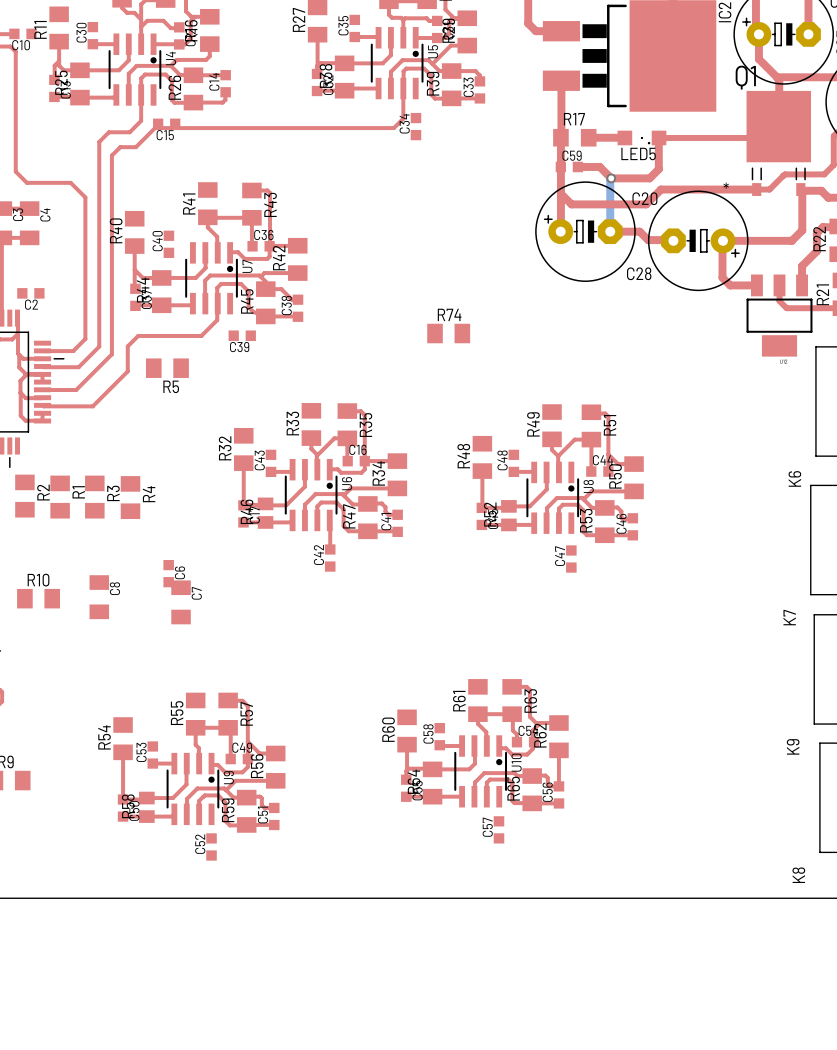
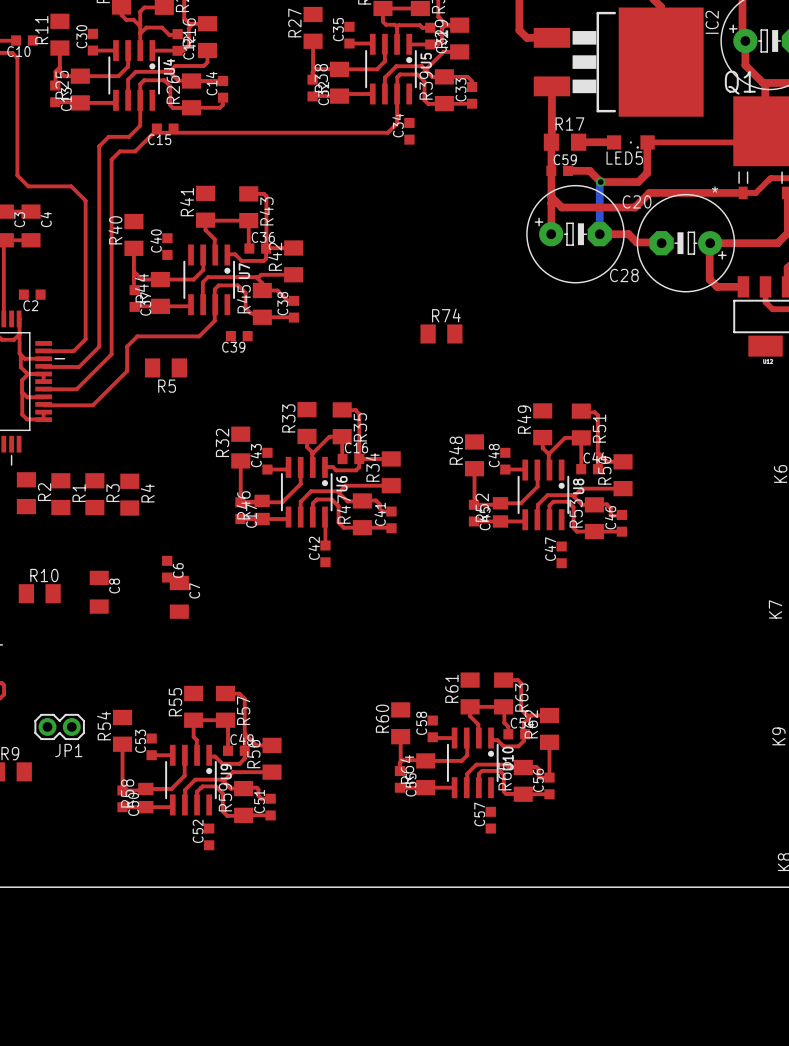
JP1: none -> (59, 726)

